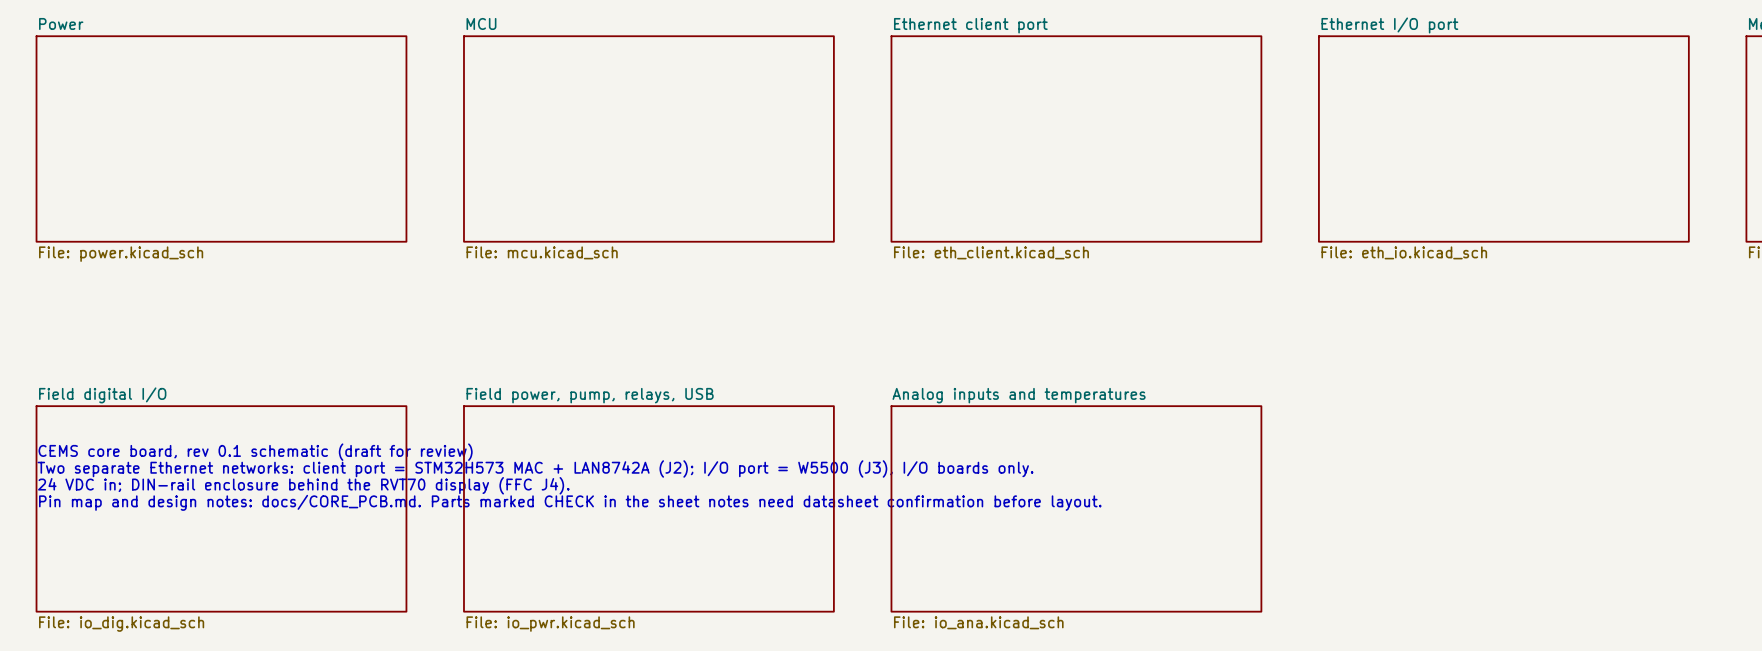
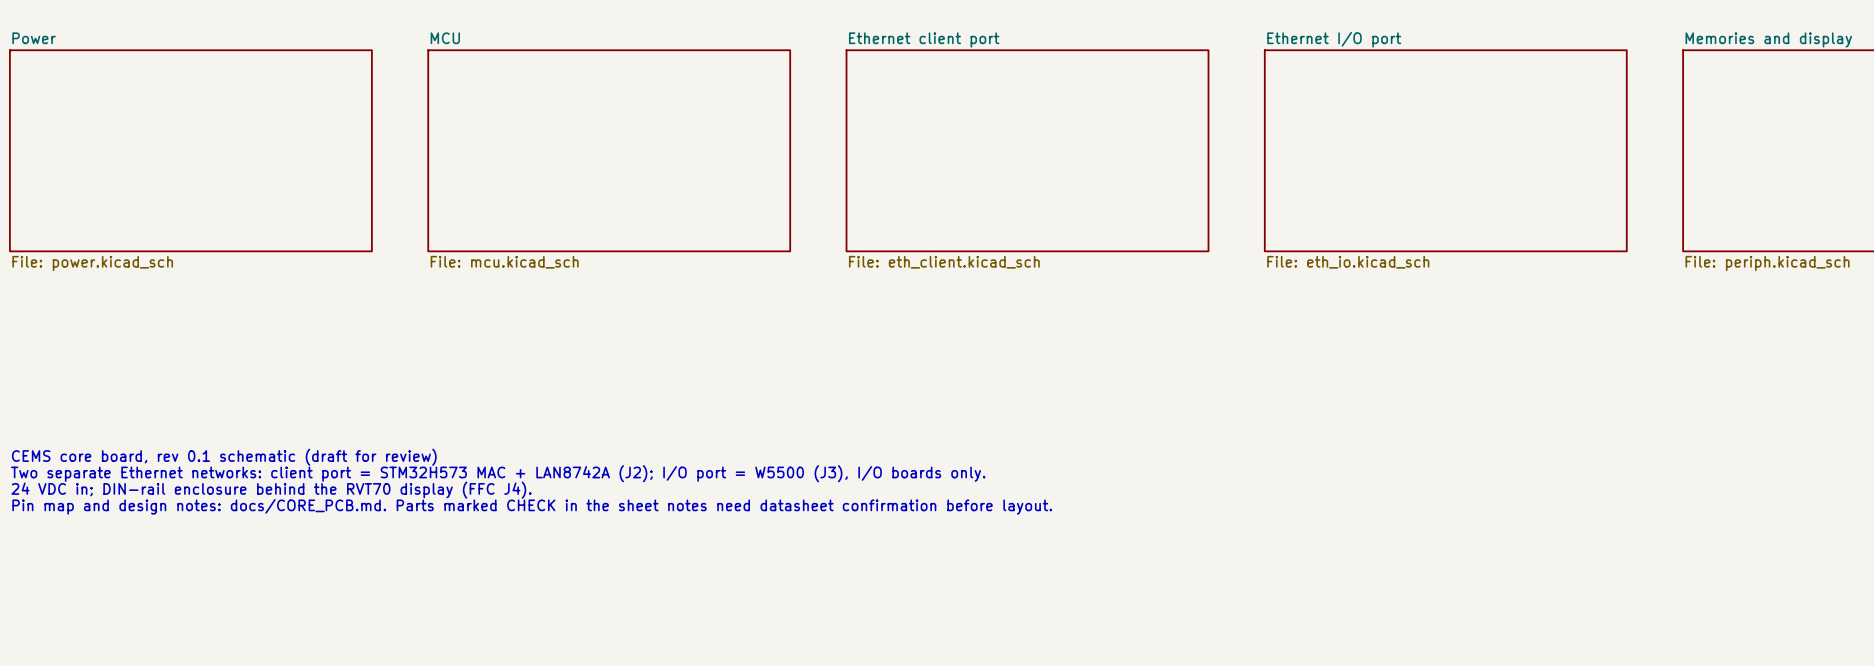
sheet Field digital I/O: File: io_dig.kicad_sch (221, 508) -> none
sheet Field power, pump, relays, USB: File: io_pwr.kicad_sch (648, 508) -> none
sheet Analog inputs and temperatures: File: io_ana.kicad_sch (1076, 508) -> none

